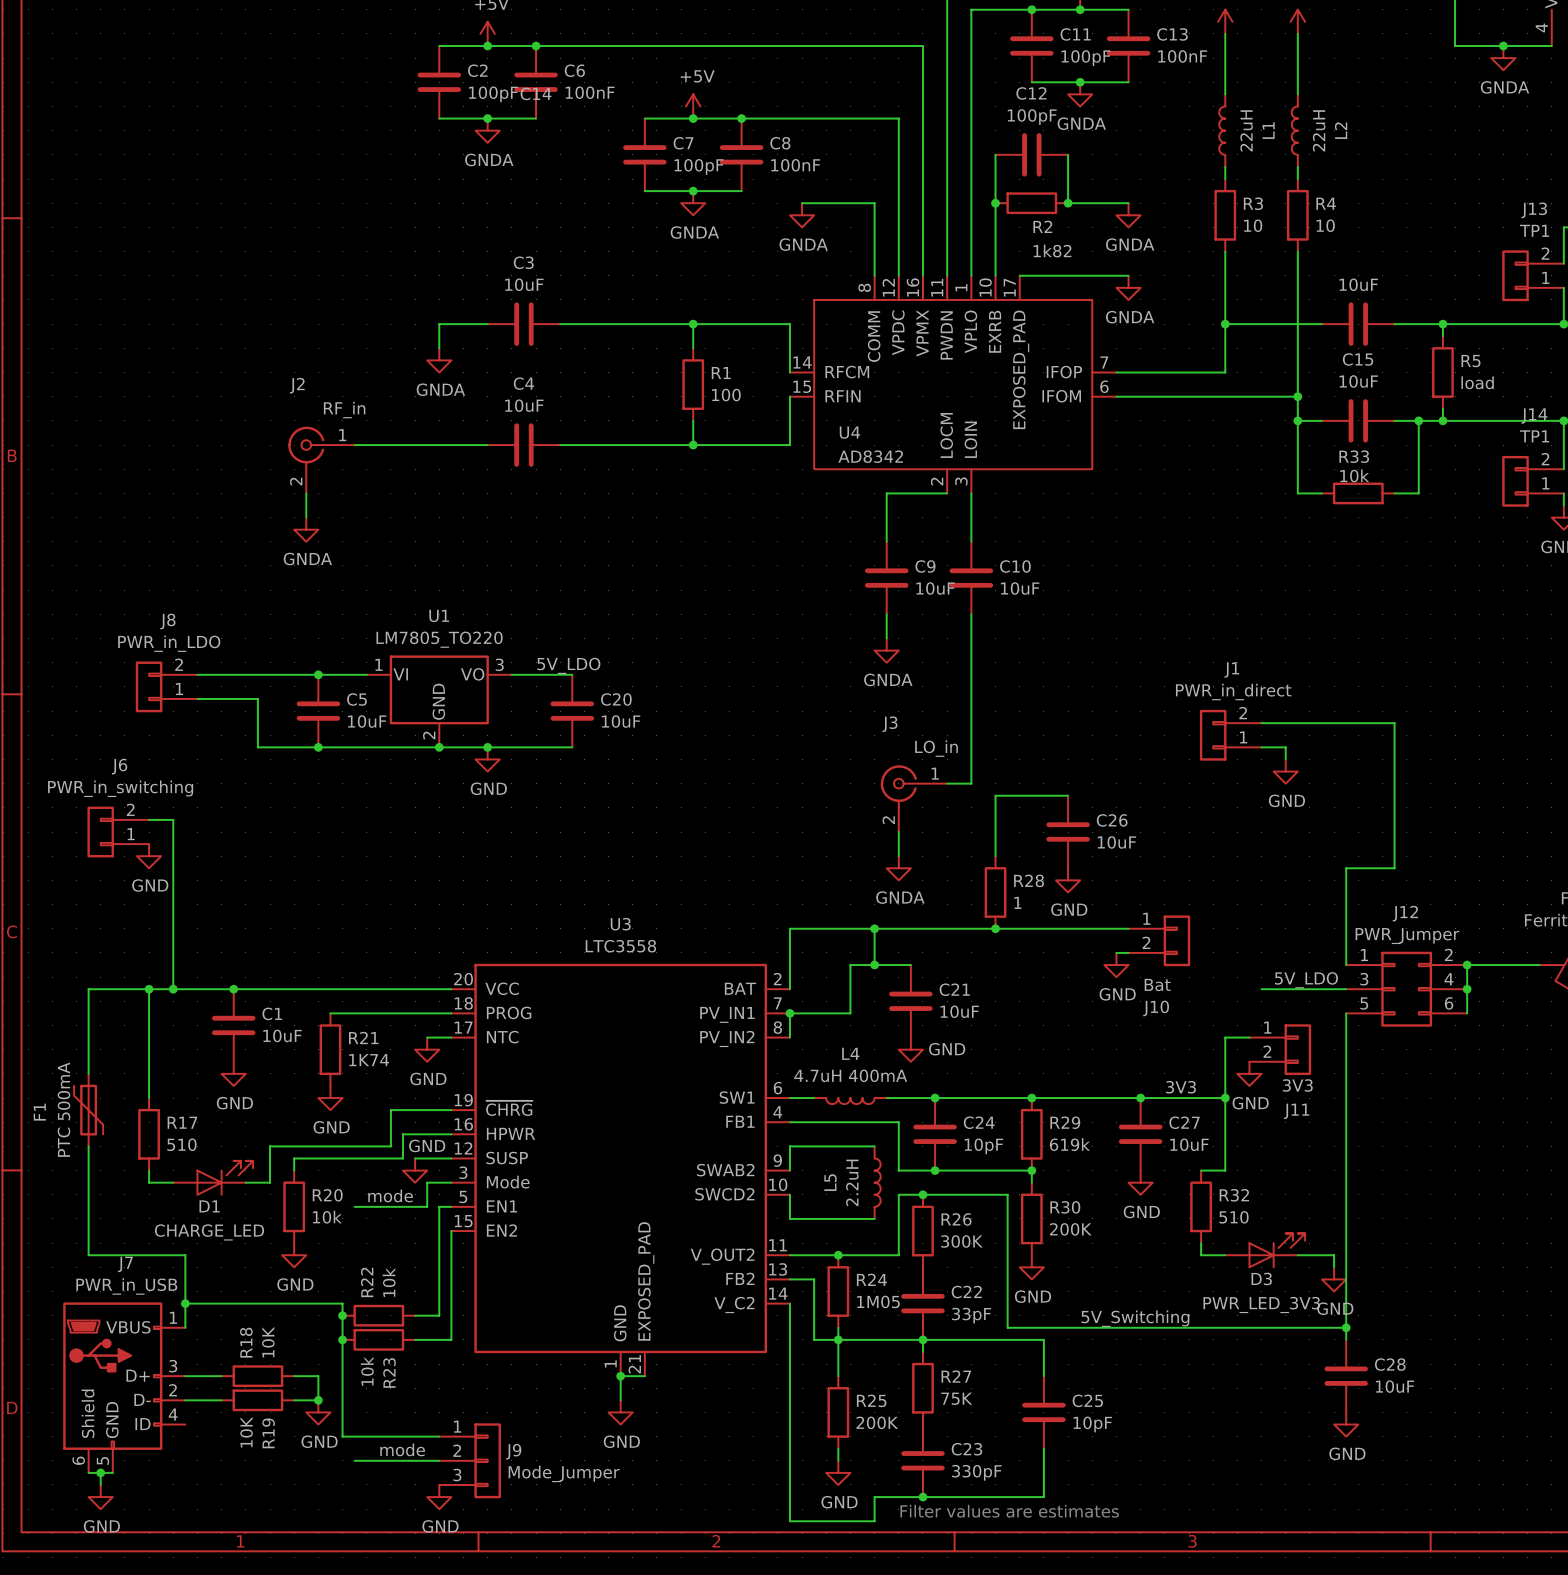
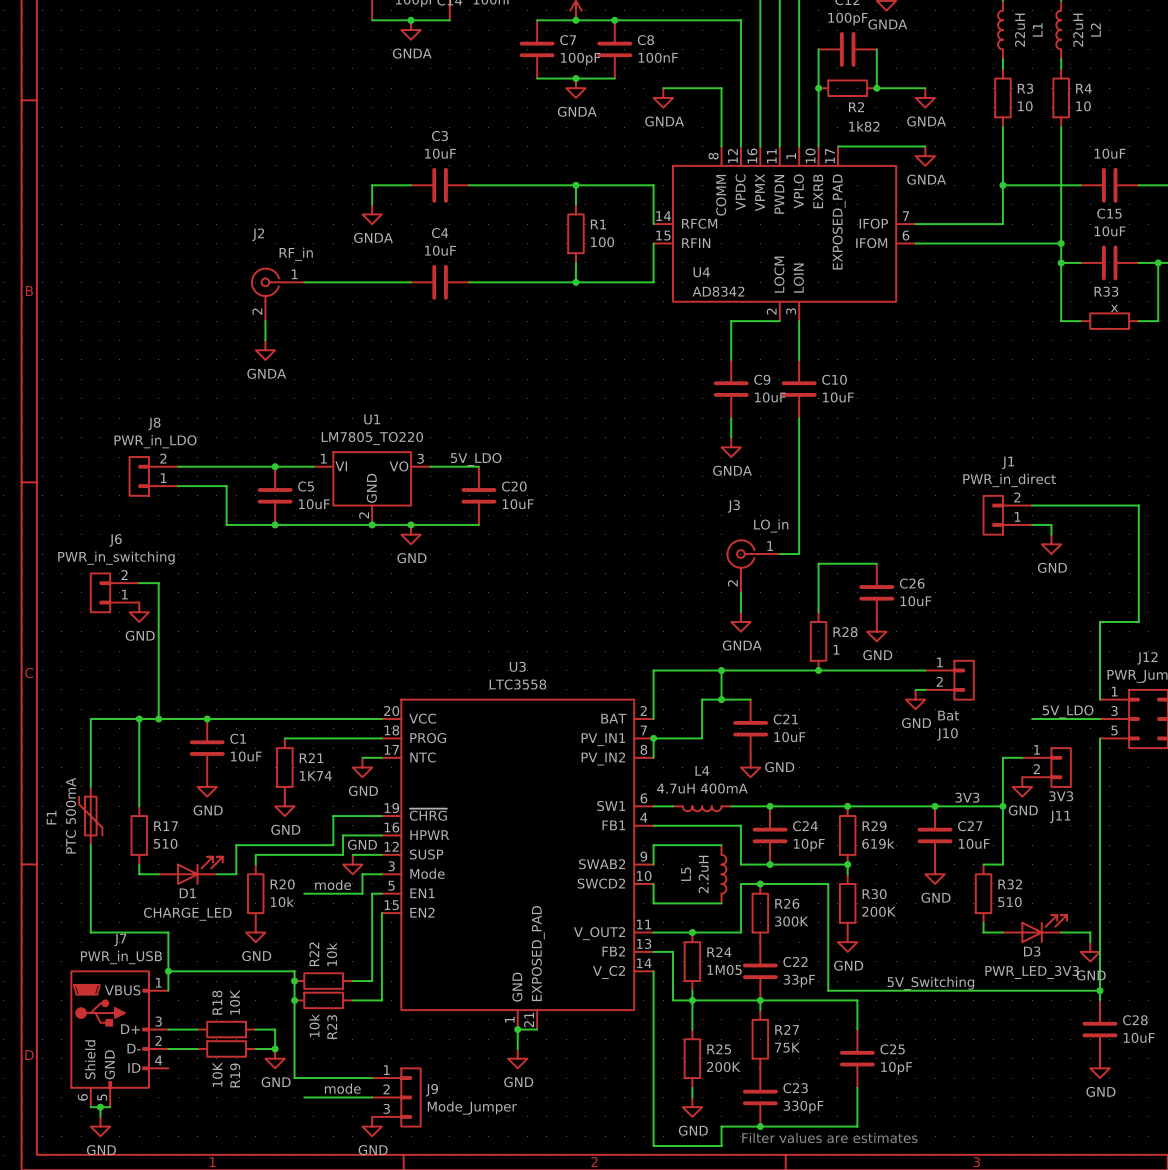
R33 value: 10k (1354, 475) -> x (1114, 308)

